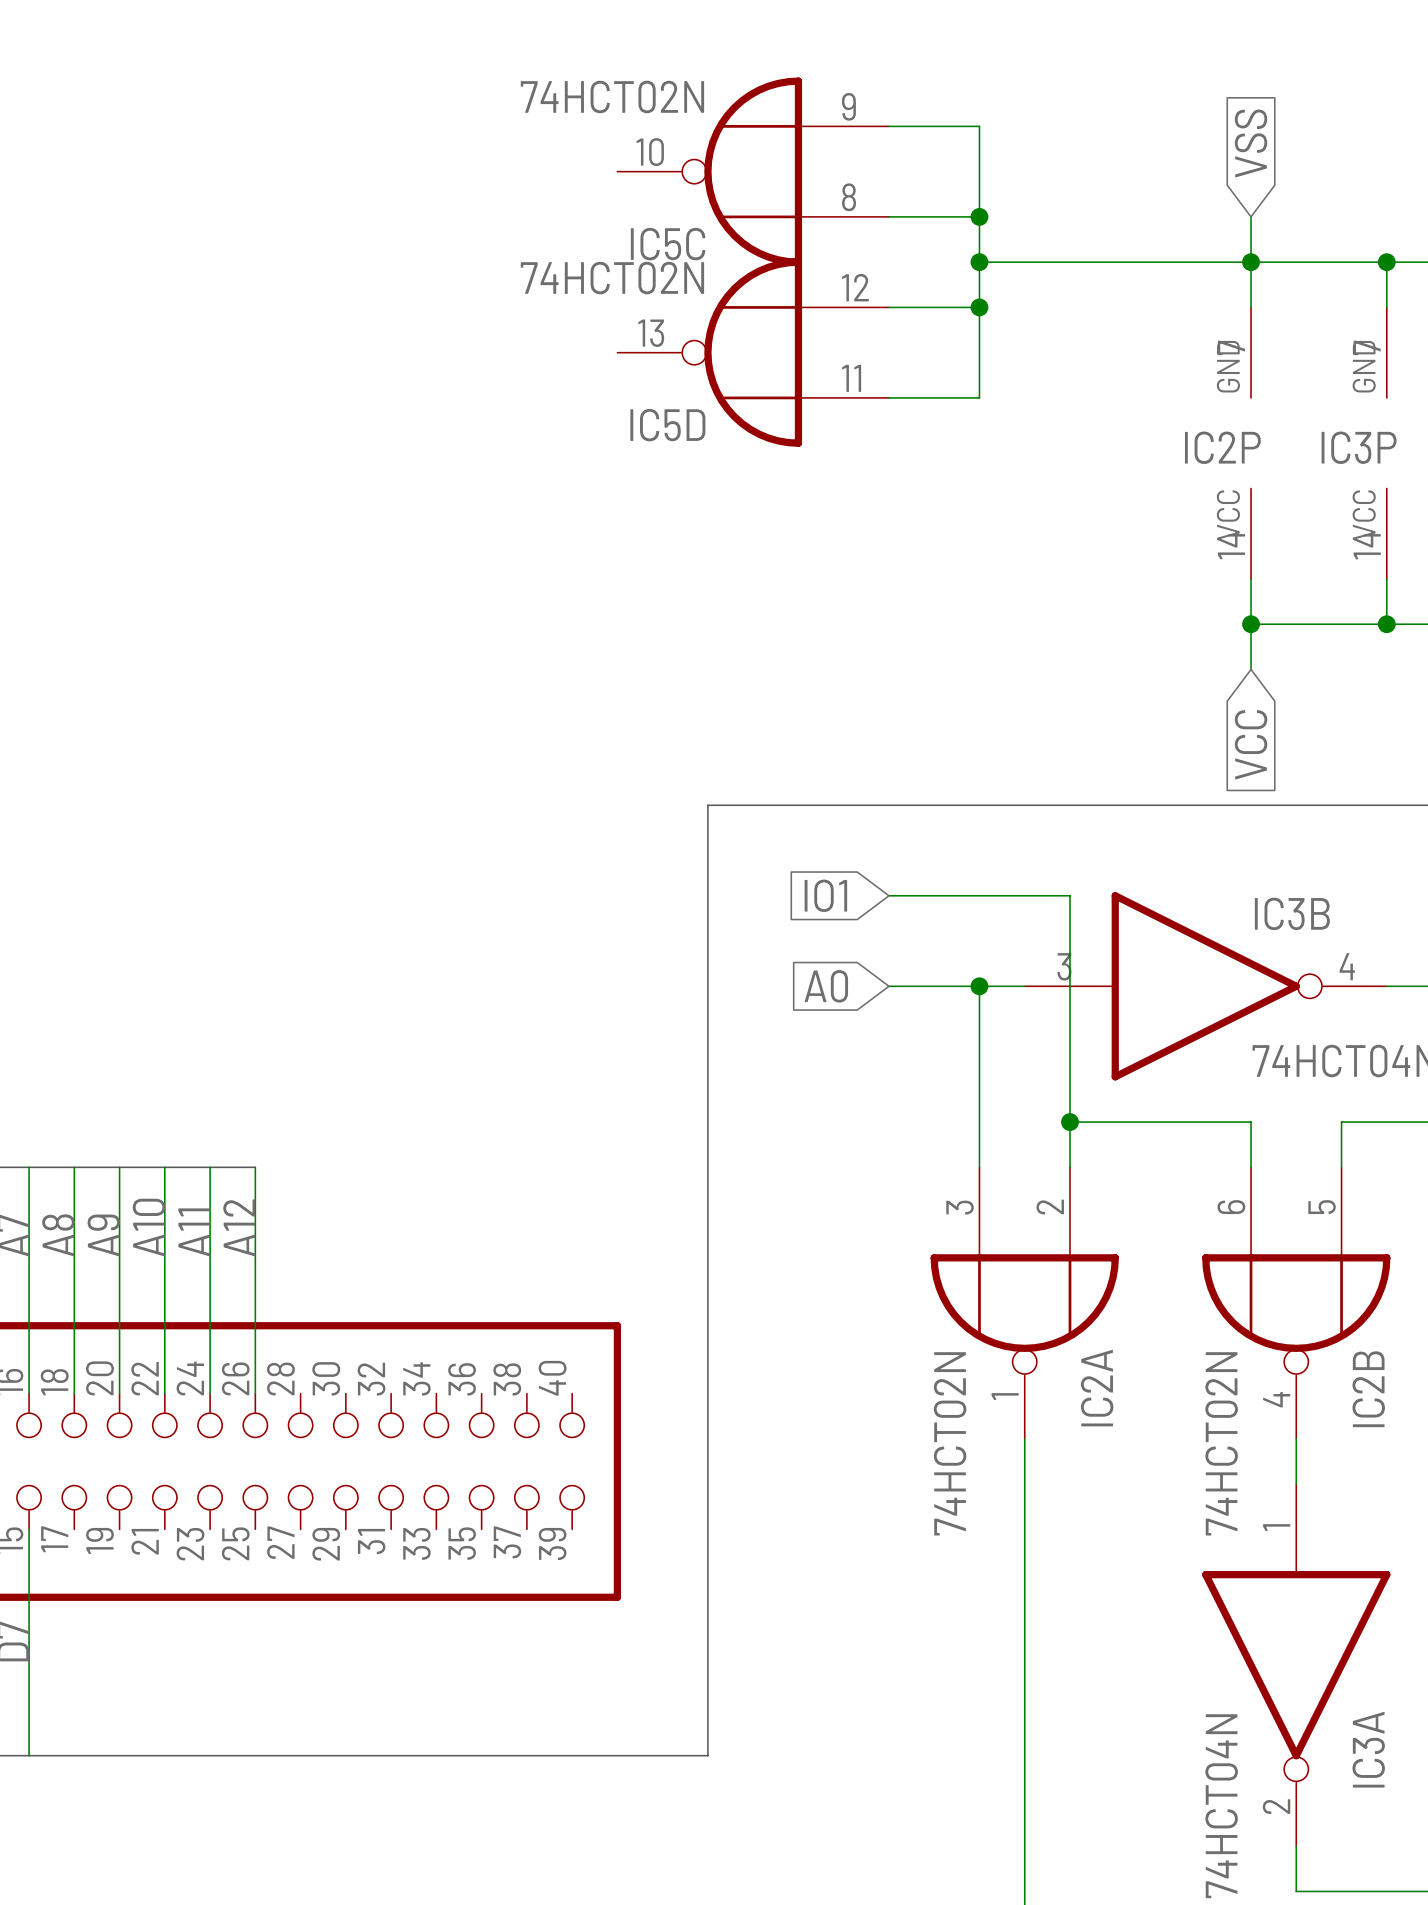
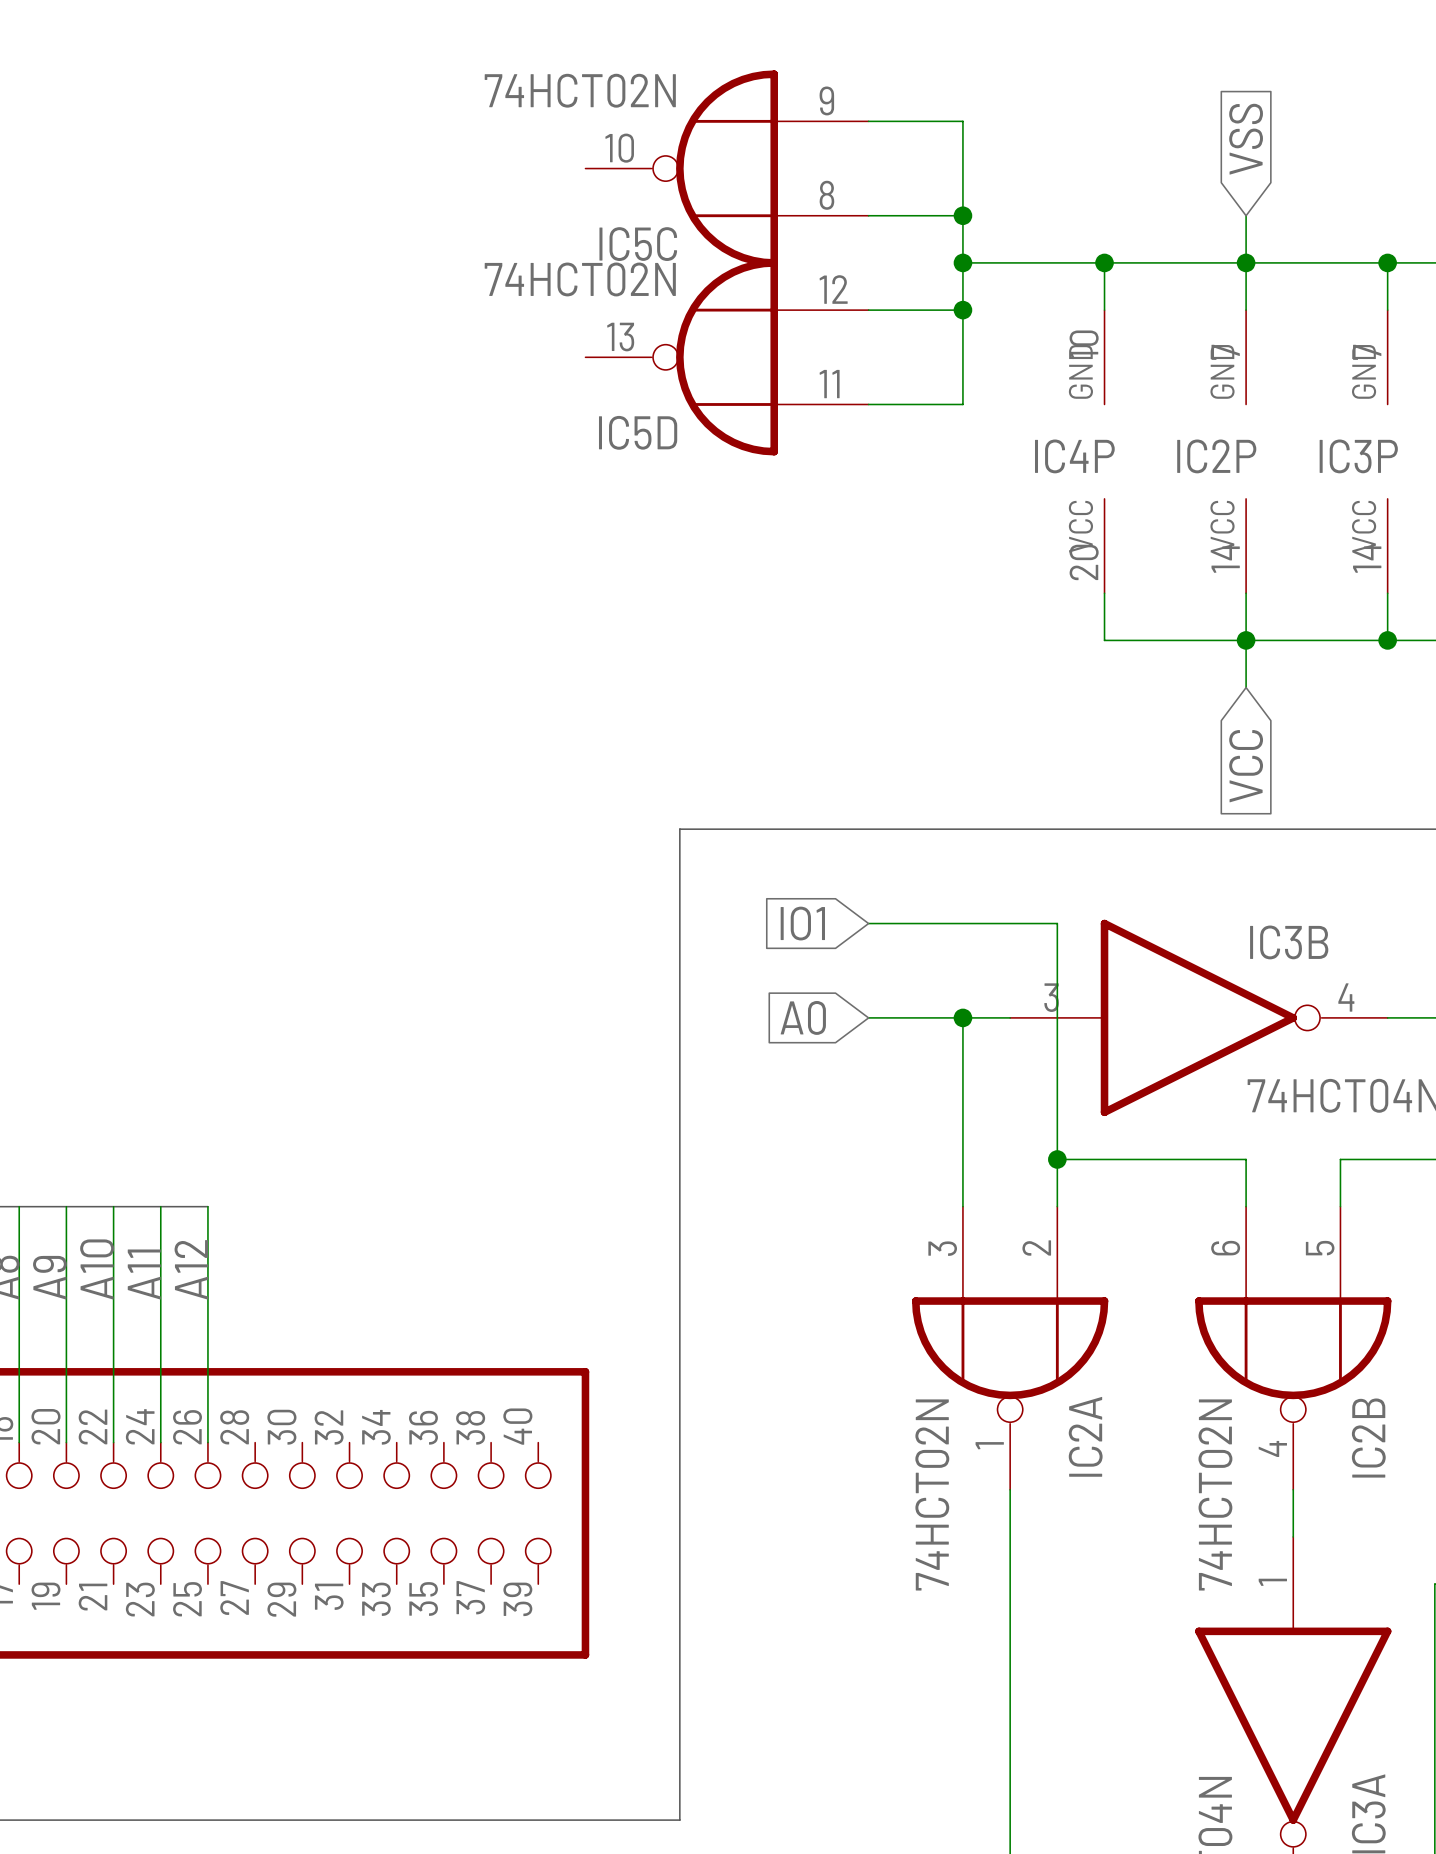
wire: none -> (1104, 262) (1104, 310)
junction: none -> (1104, 262)
IC4P: none -> (1104, 451)
wire: none -> (1104, 593) (1104, 640) (1246, 640)

